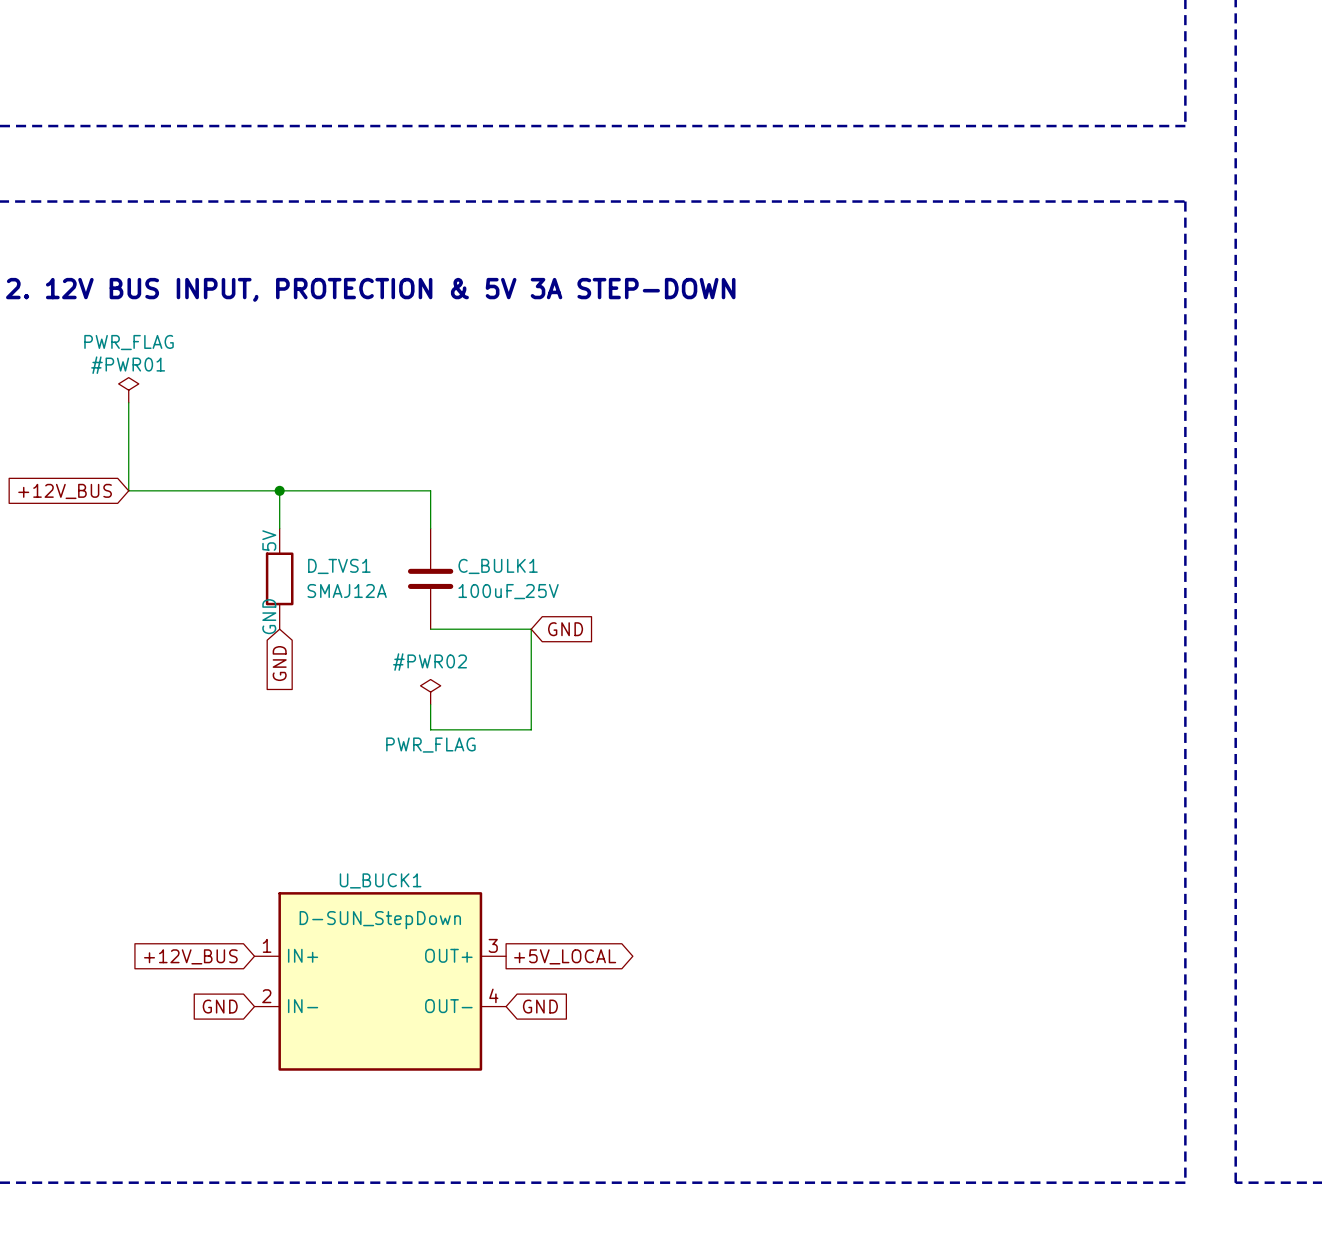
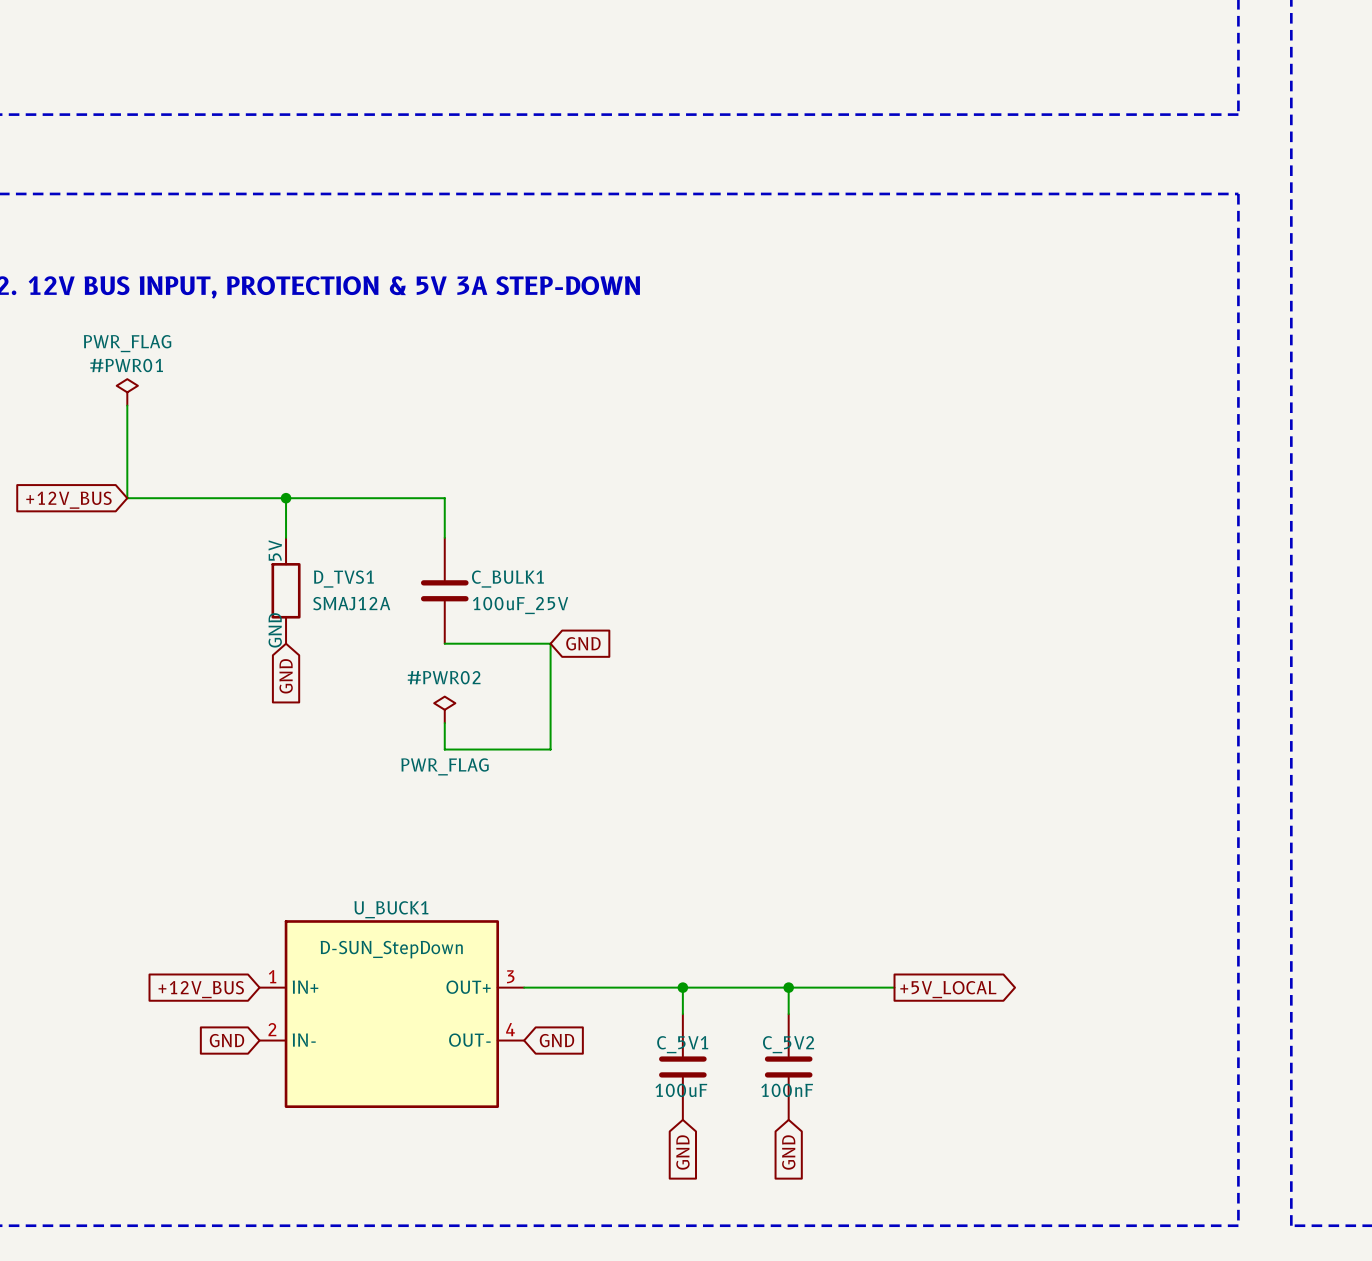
wire: none -> (524, 987) (894, 987)
global label: +5V_LOCAL (565, 956) -> none
wire: none -> (682, 987) (682, 1014)
junction: none -> (682, 987)
wire: none -> (788, 987) (788, 1014)
junction: none -> (788, 987)
global label: none -> +5V_LOCAL (948, 989)
C_5V1: none -> 100uF (682, 1066)
C_5V2: none -> 100nF (788, 1066)
global label: none -> GND (682, 1152)
global label: none -> GND (788, 1152)

